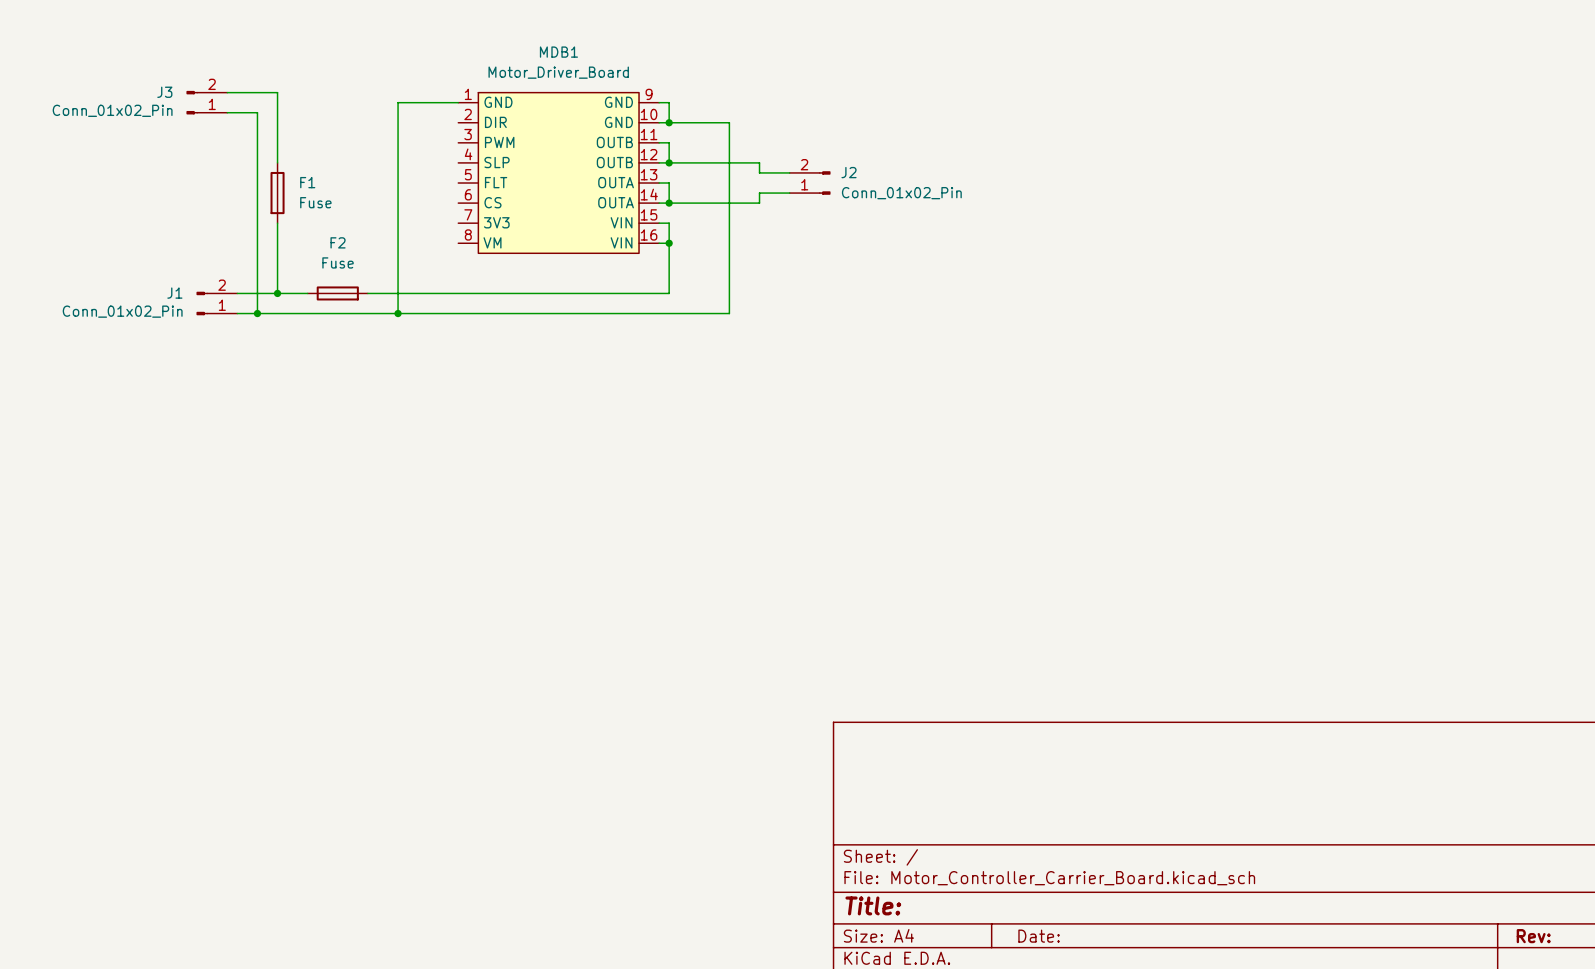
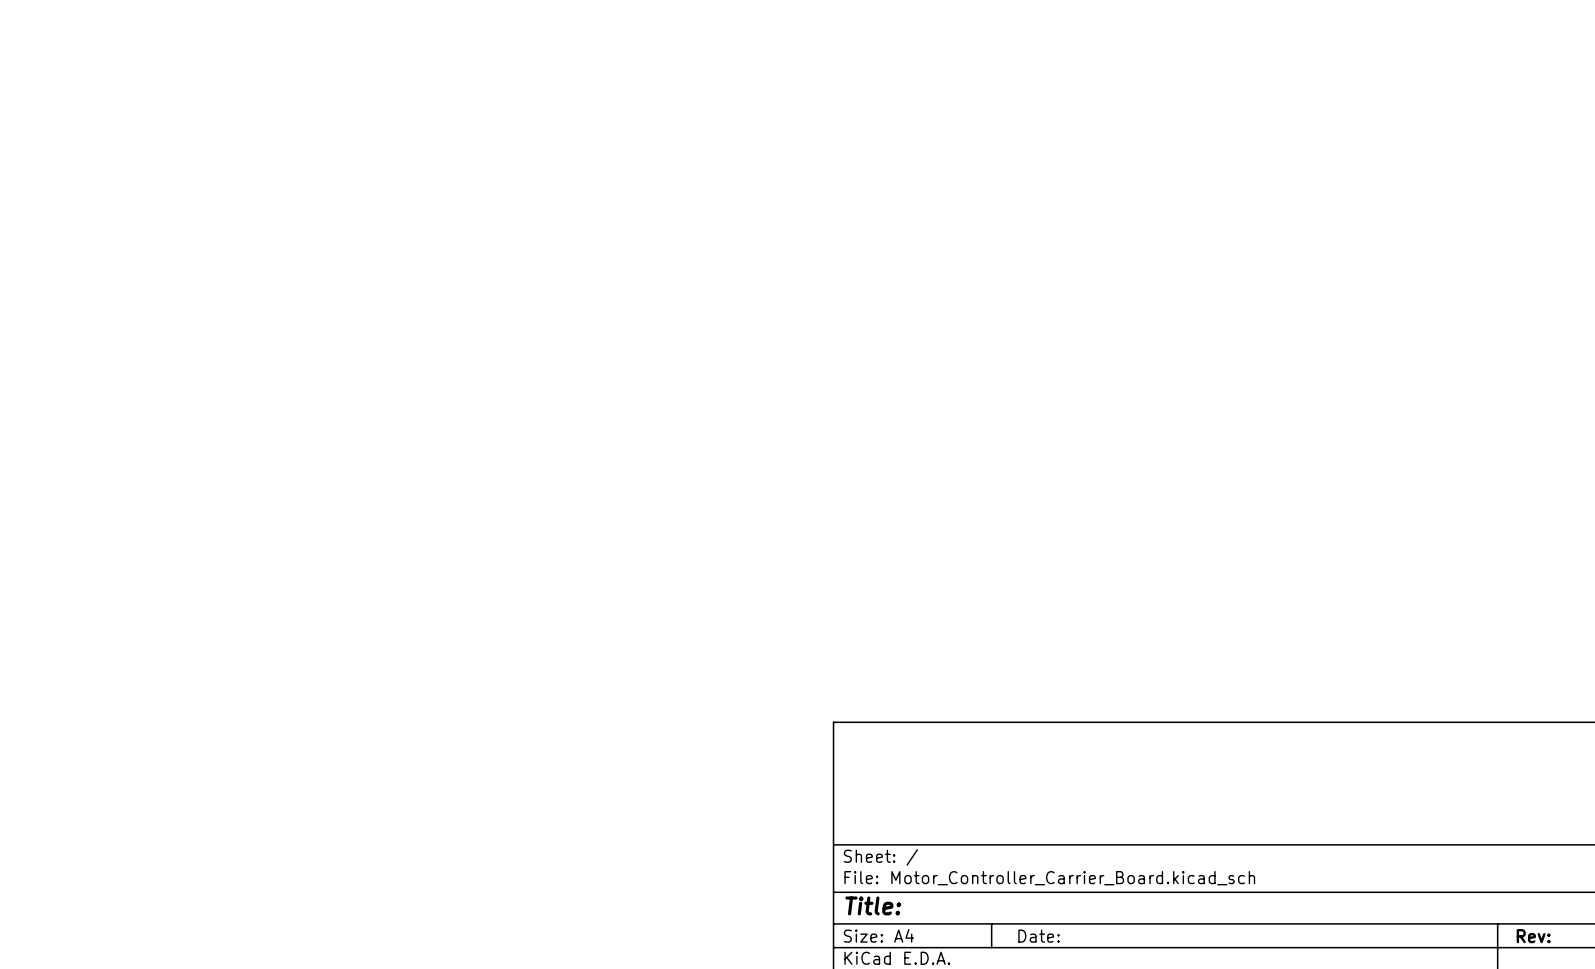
wire: (227, 92) (277, 92) (277, 162) -> none
J3: Conn_01x02_Pin (206, 102) -> none
wire: (458, 102) (398, 102) (398, 313) -> none
wire: (659, 102) (669, 102) (669, 122) -> none
wire: (227, 112) (257, 112) (257, 313) -> none
wire: (659, 122) (729, 122) (729, 313) (237, 313) -> none
junction: (669, 122) -> none
wire: (659, 142) (669, 142) (669, 162) -> none
wire: (659, 162) (759, 162) (759, 172) (789, 172) -> none
junction: (669, 162) -> none
MDB1: Motor_Driver_Board (558, 172) -> none
wire: (659, 183) (669, 183) (669, 203) -> none
J2: Conn_01x02_Pin (810, 183) -> none
F1: Fuse (277, 193) -> none
wire: (789, 193) (759, 193) (759, 203) (659, 203) -> none
junction: (669, 203) -> none
wire: (277, 223) (277, 293) -> none
wire: (659, 223) (669, 223) (669, 293) (367, 293) -> none
wire: (659, 243) (669, 243) -> none
junction: (669, 243) -> none
wire: (237, 293) (307, 293) -> none
junction: (277, 293) -> none
F2: Fuse (337, 293) -> none
J1: Conn_01x02_Pin (216, 303) -> none
junction: (257, 313) -> none
junction: (398, 313) -> none

